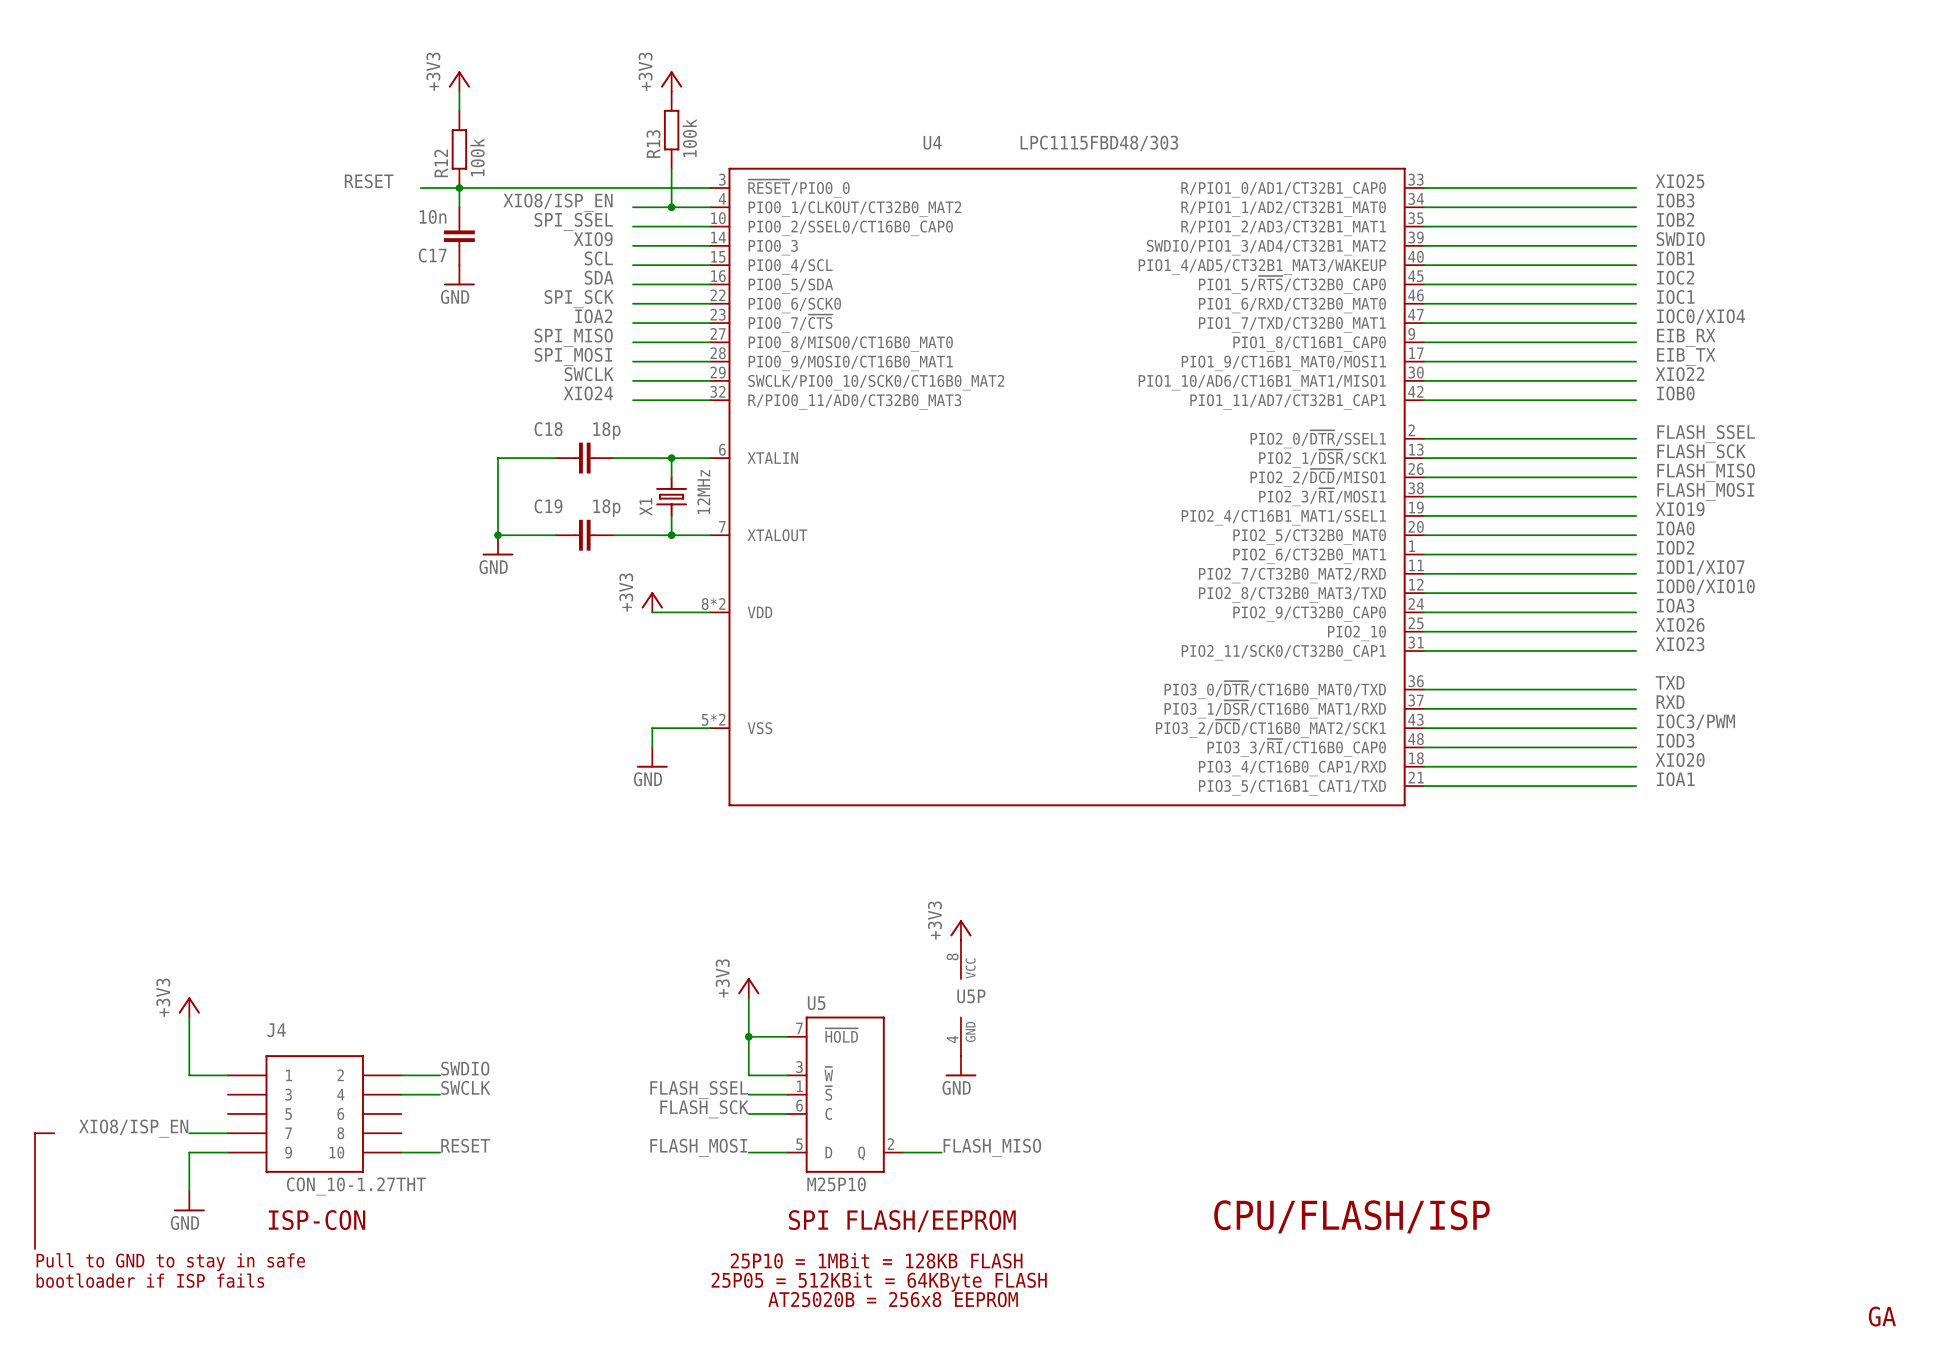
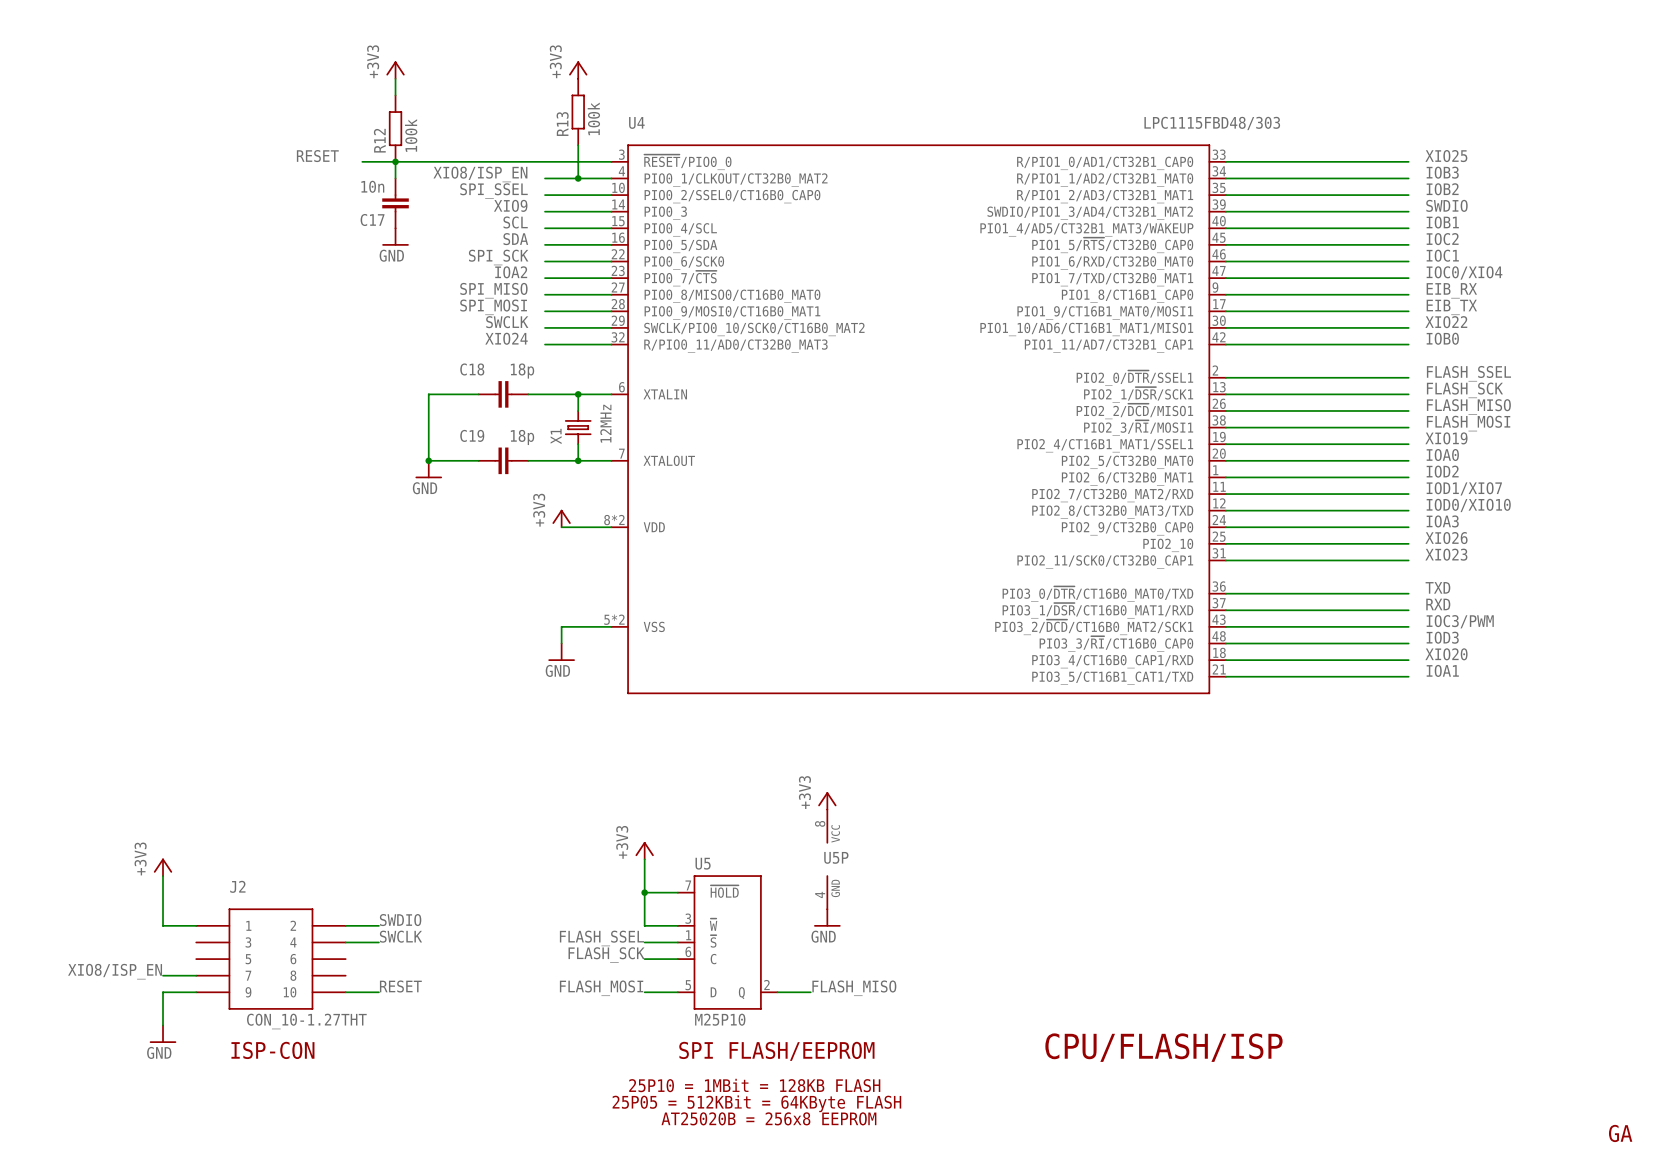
U4 name position: U4 (932, 142) -> U4 (636, 122)
U4 value position: LPC1115FBD48/303 (1099, 143) -> LPC1115FBD48/303 (1212, 123)
J4 name: J4 (276, 1030) -> J2 (237, 886)
line: (54, 1133) (35, 1133) (35, 1249) -> none
text: Pull to GND to stay in safe (170, 1262) -> none
text: bootloader if ISP fails (150, 1280) -> none

